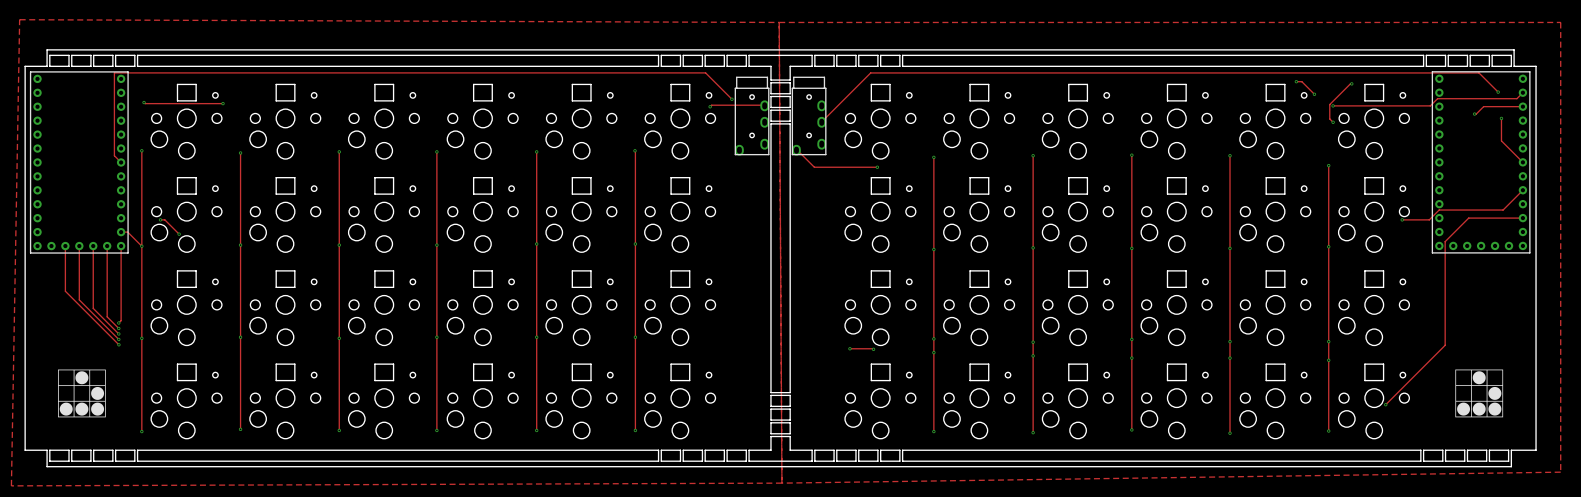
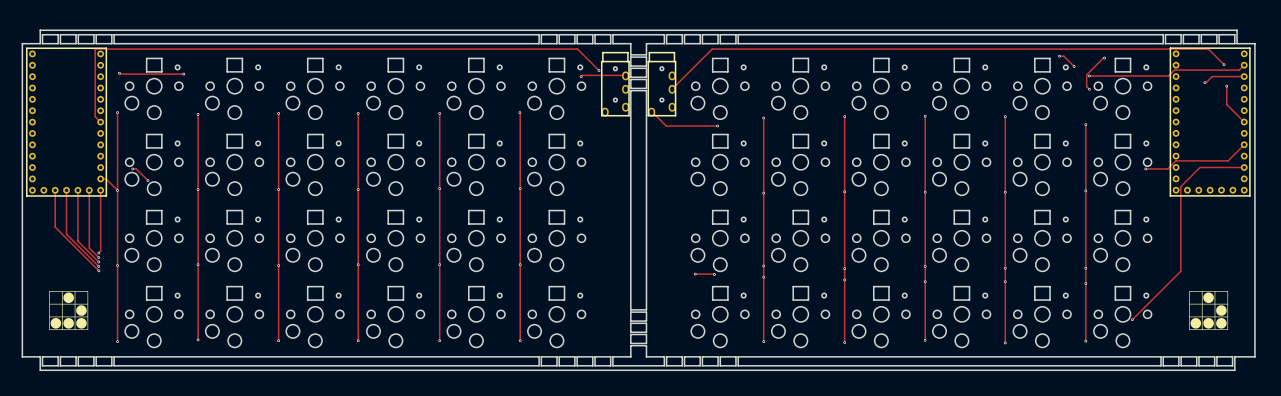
zone outline: (779, 22) (1560, 22) (1560, 472) (781, 483) -> none
zone outline: (779, 22) (781, 483) -> none
zone outline: (779, 22) (19, 19) (11, 485) (781, 483) -> none

